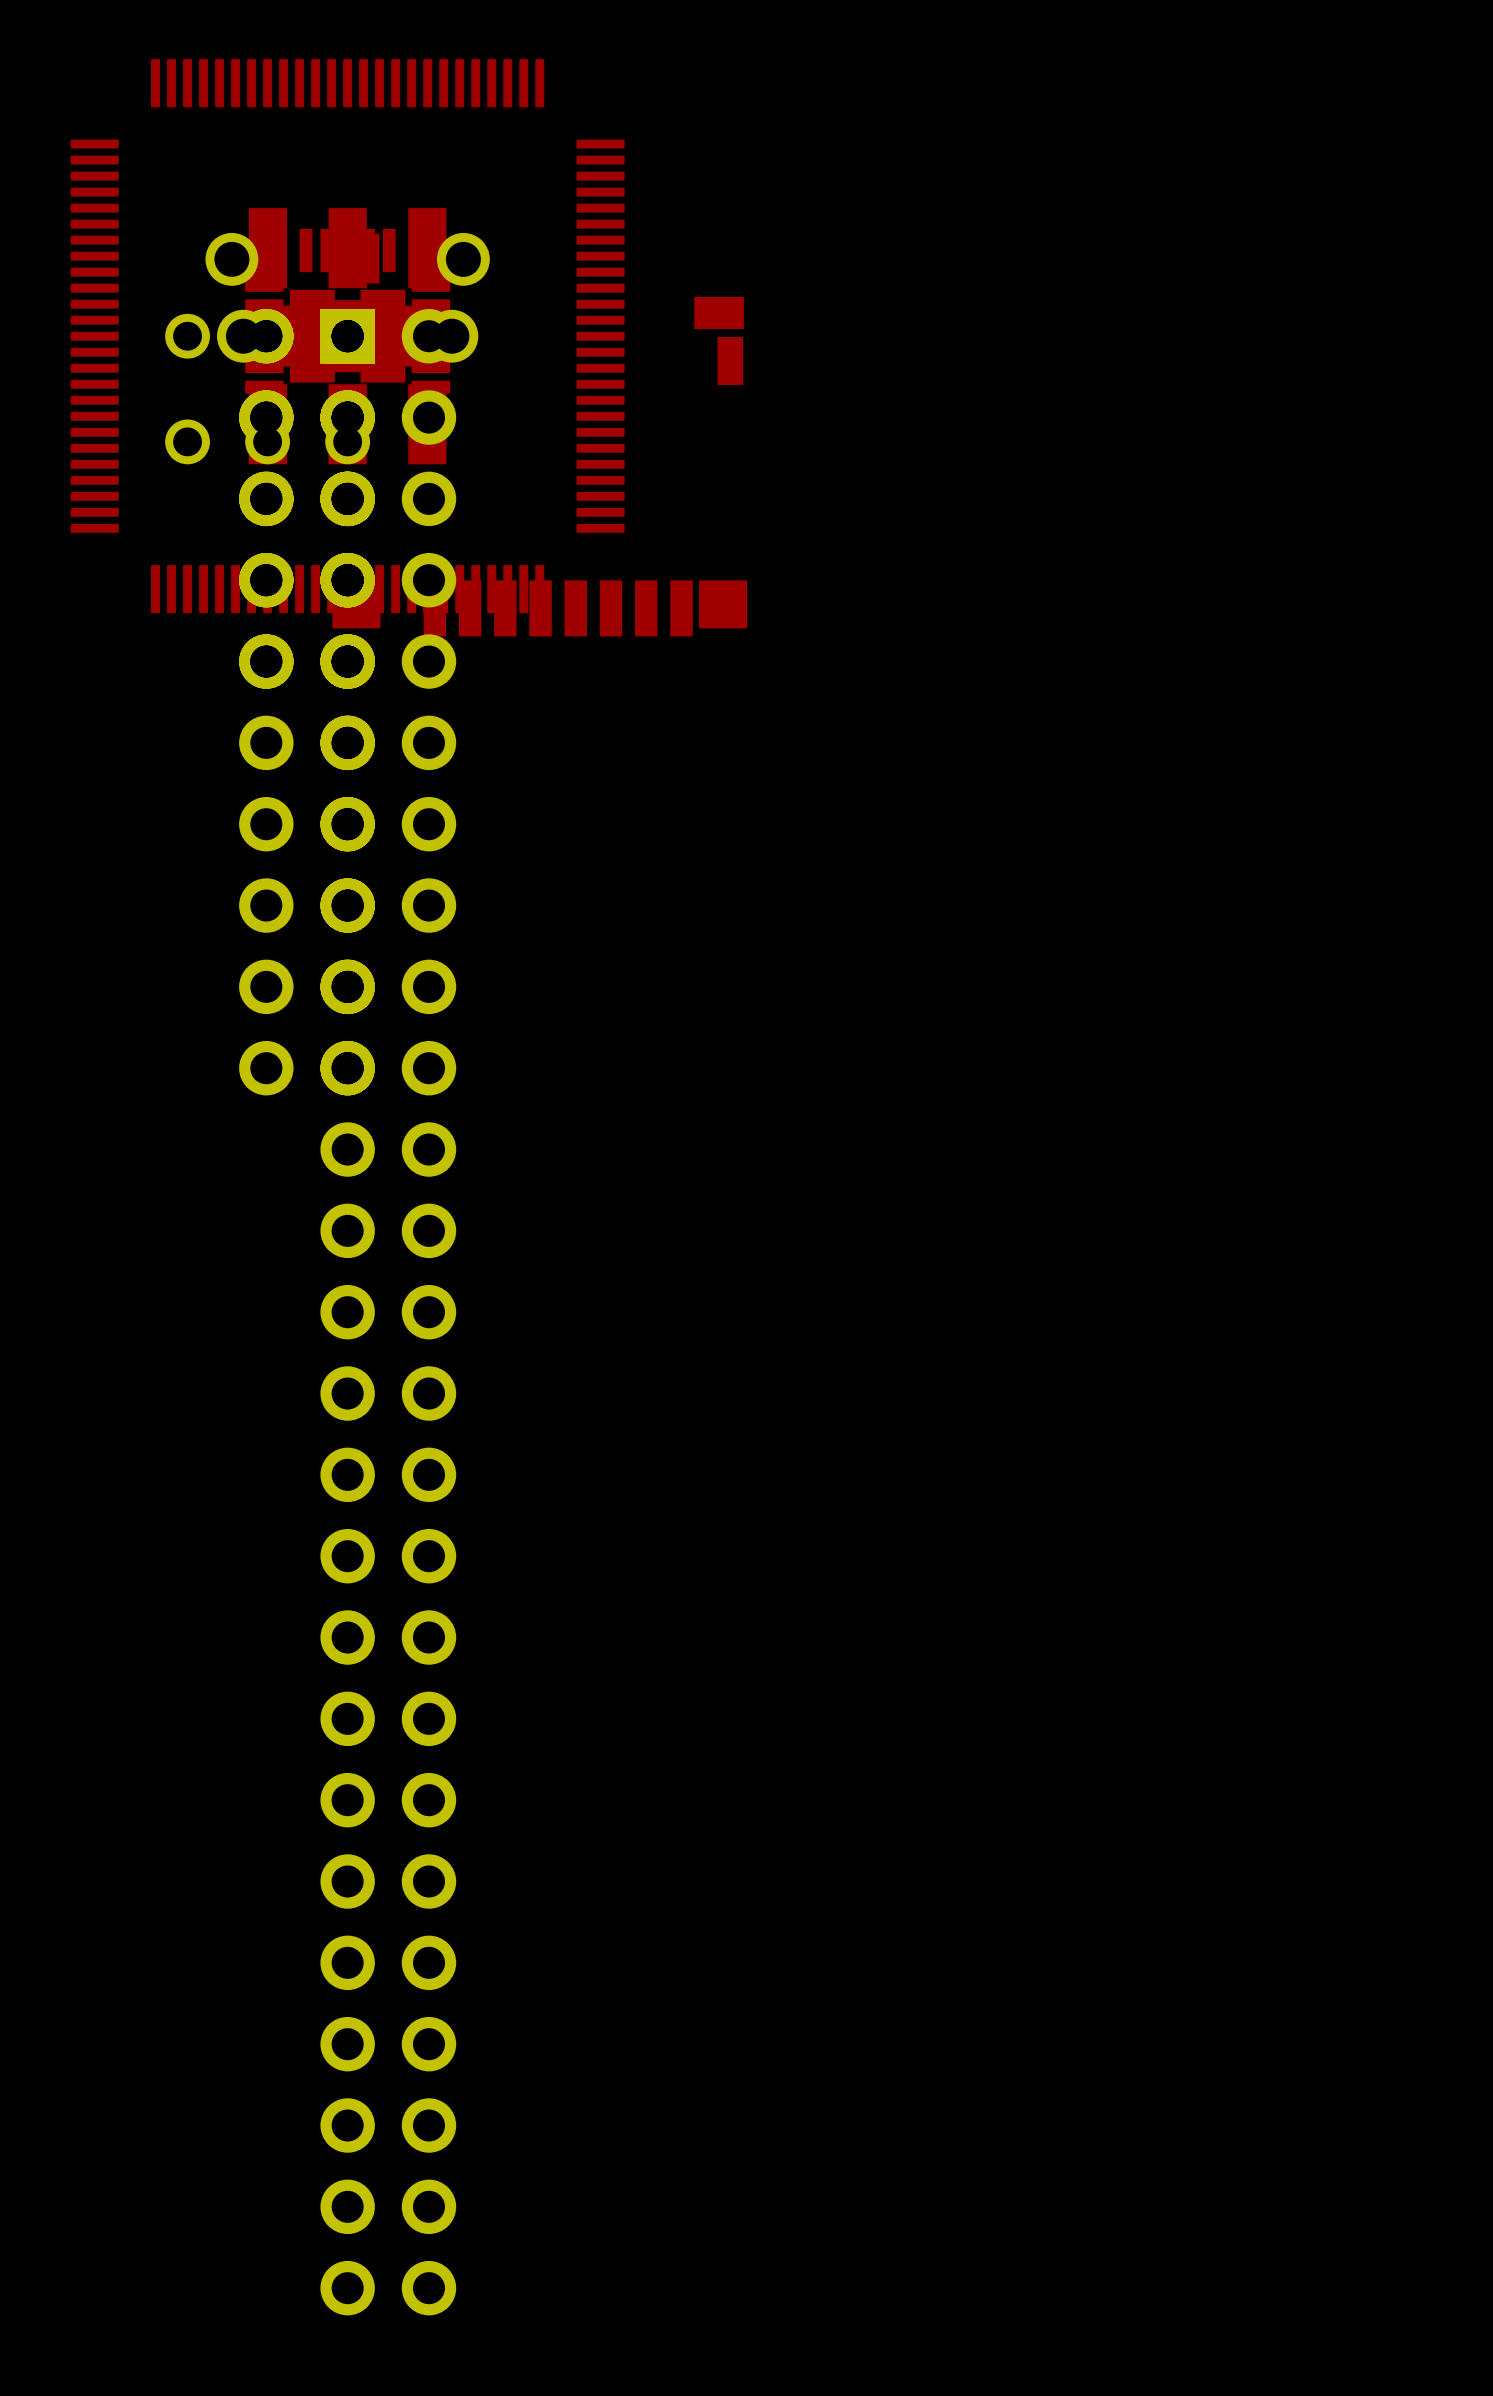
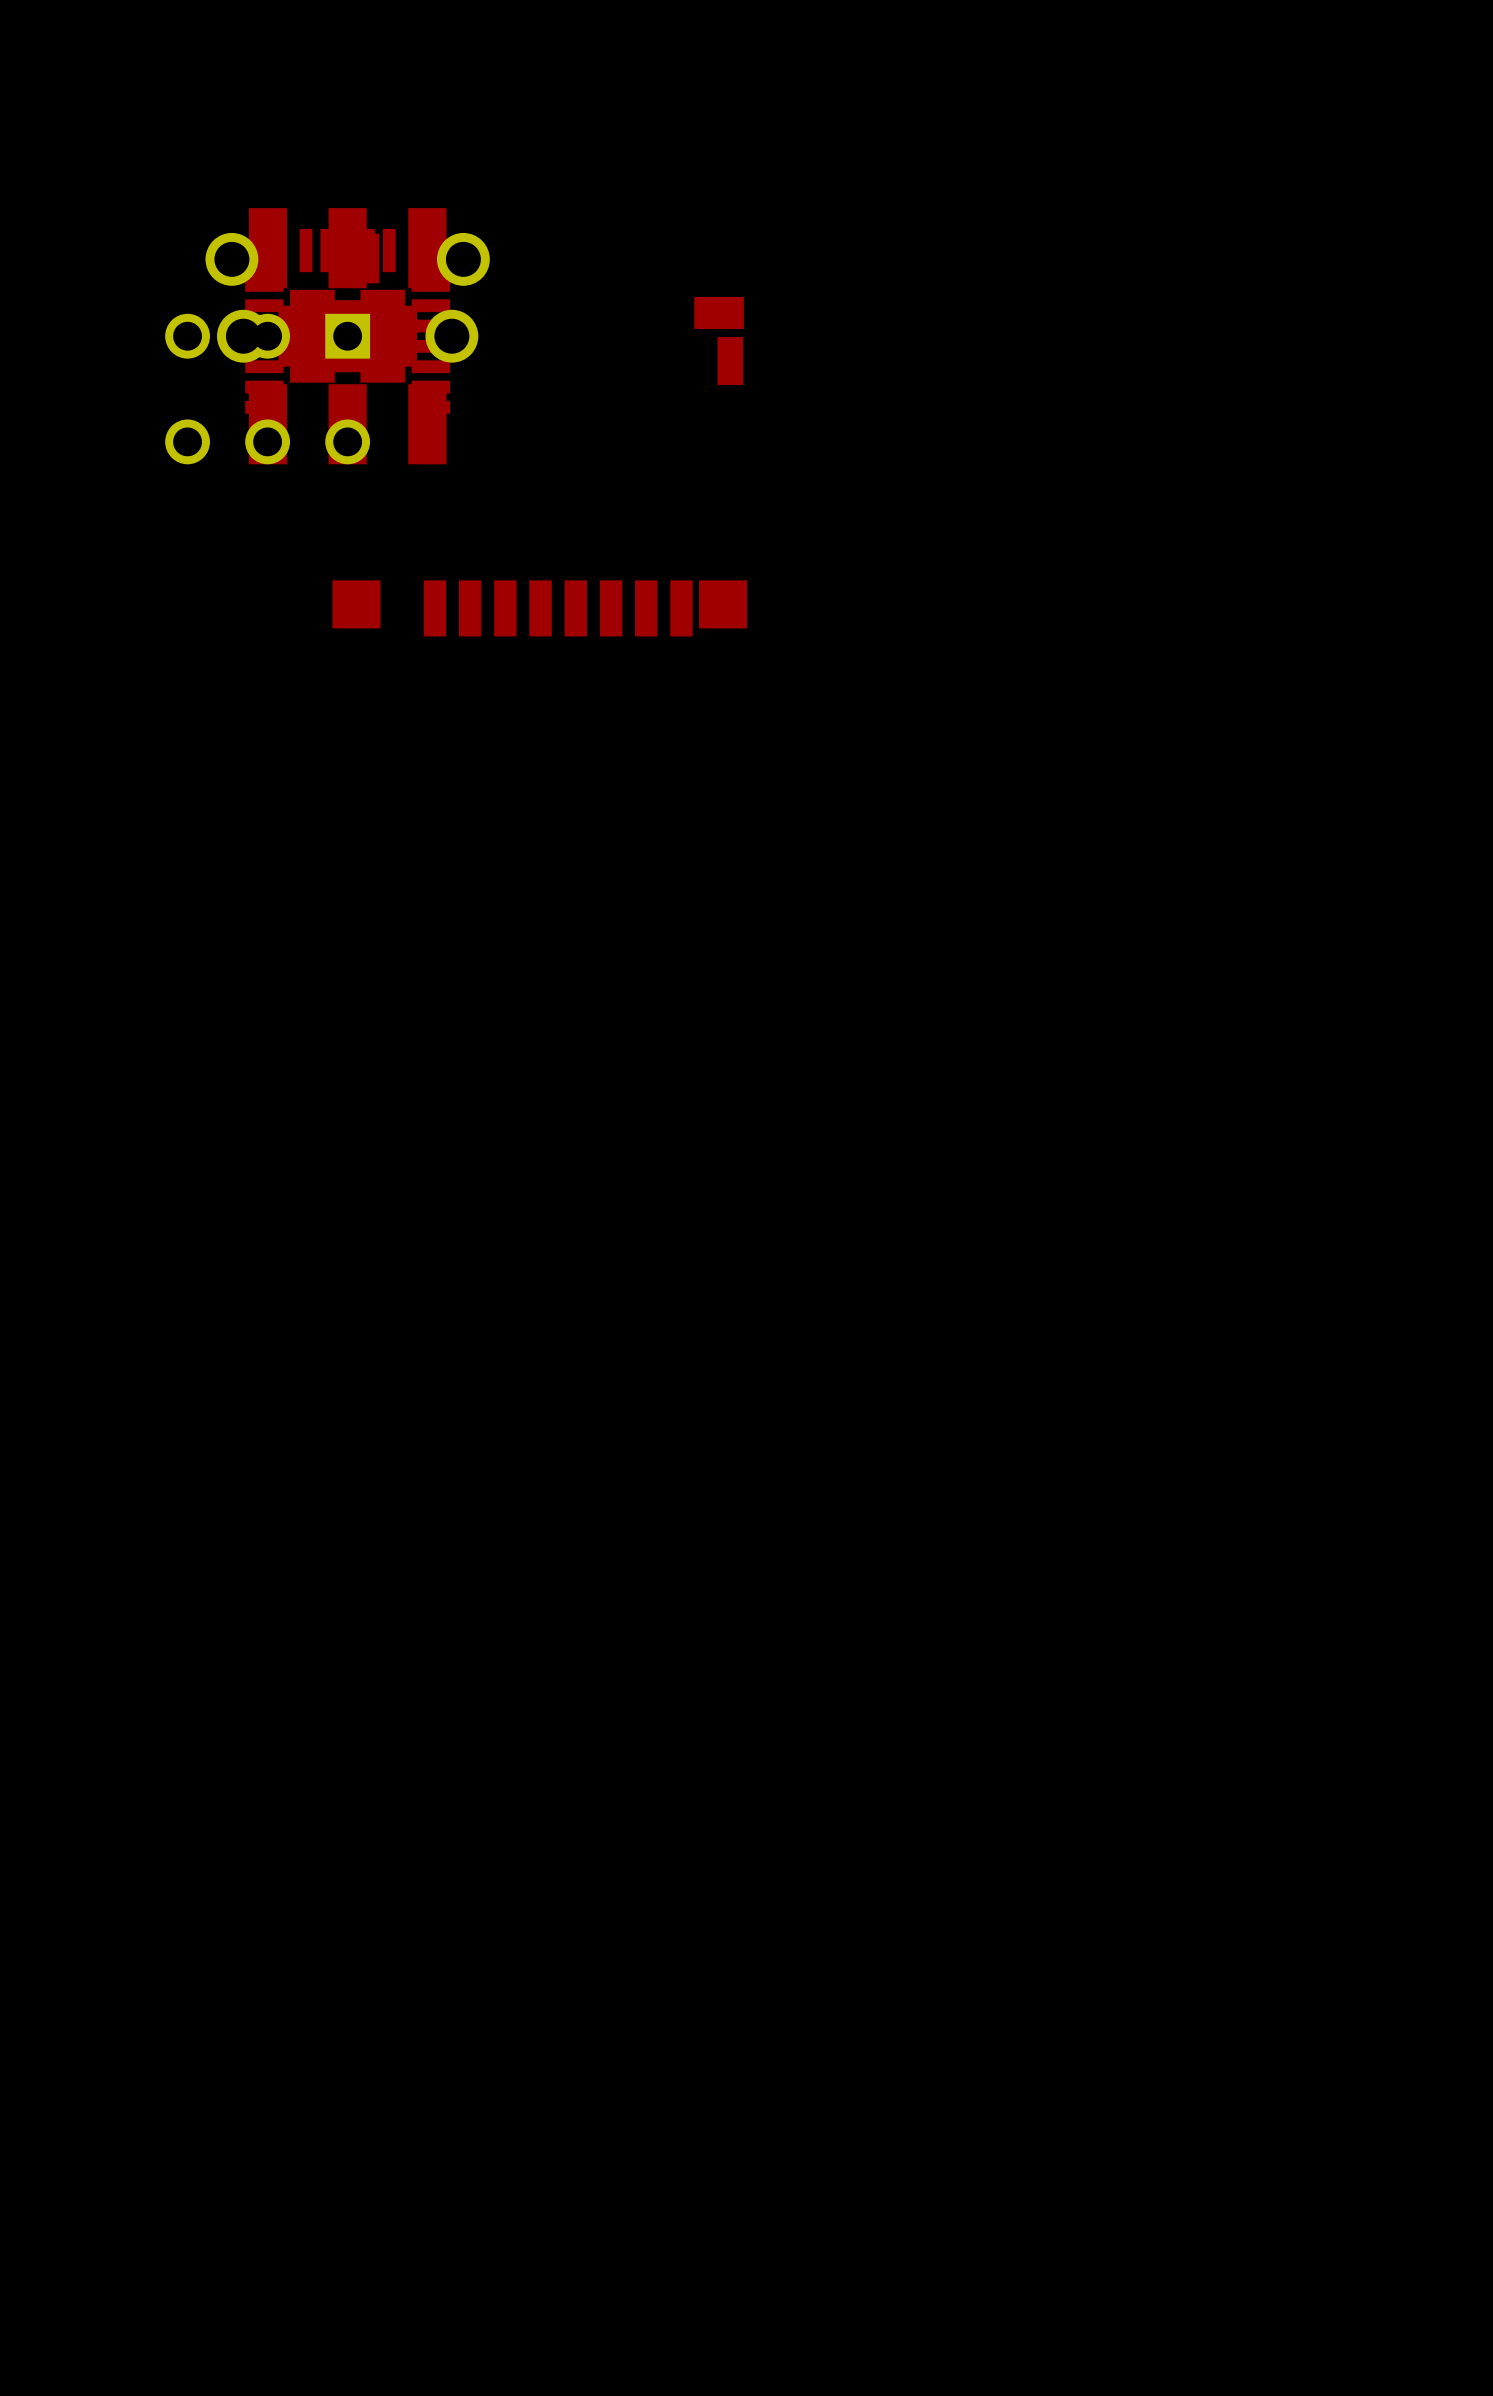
part: (347, 336) -> none
part: (306, 498) -> none
part: (306, 702) -> none
part: (388, 1312) -> none

